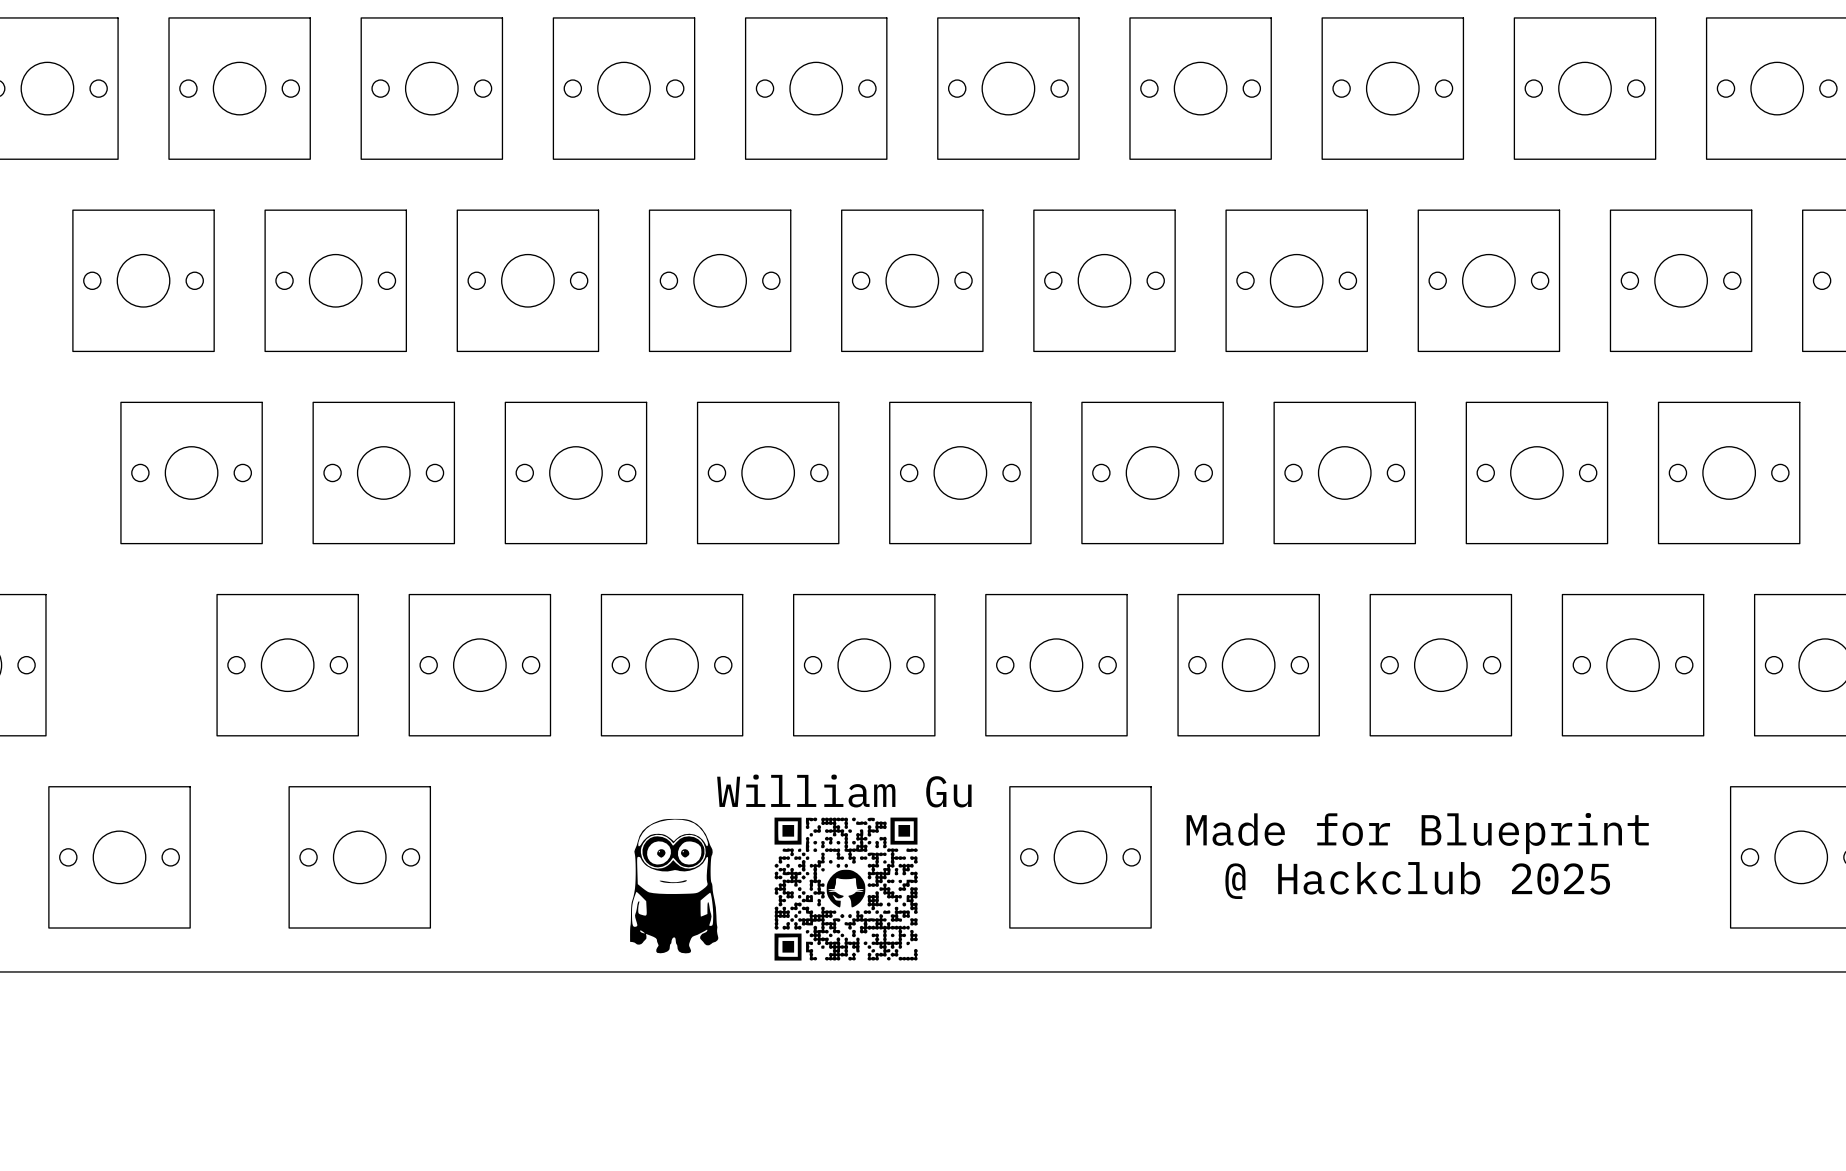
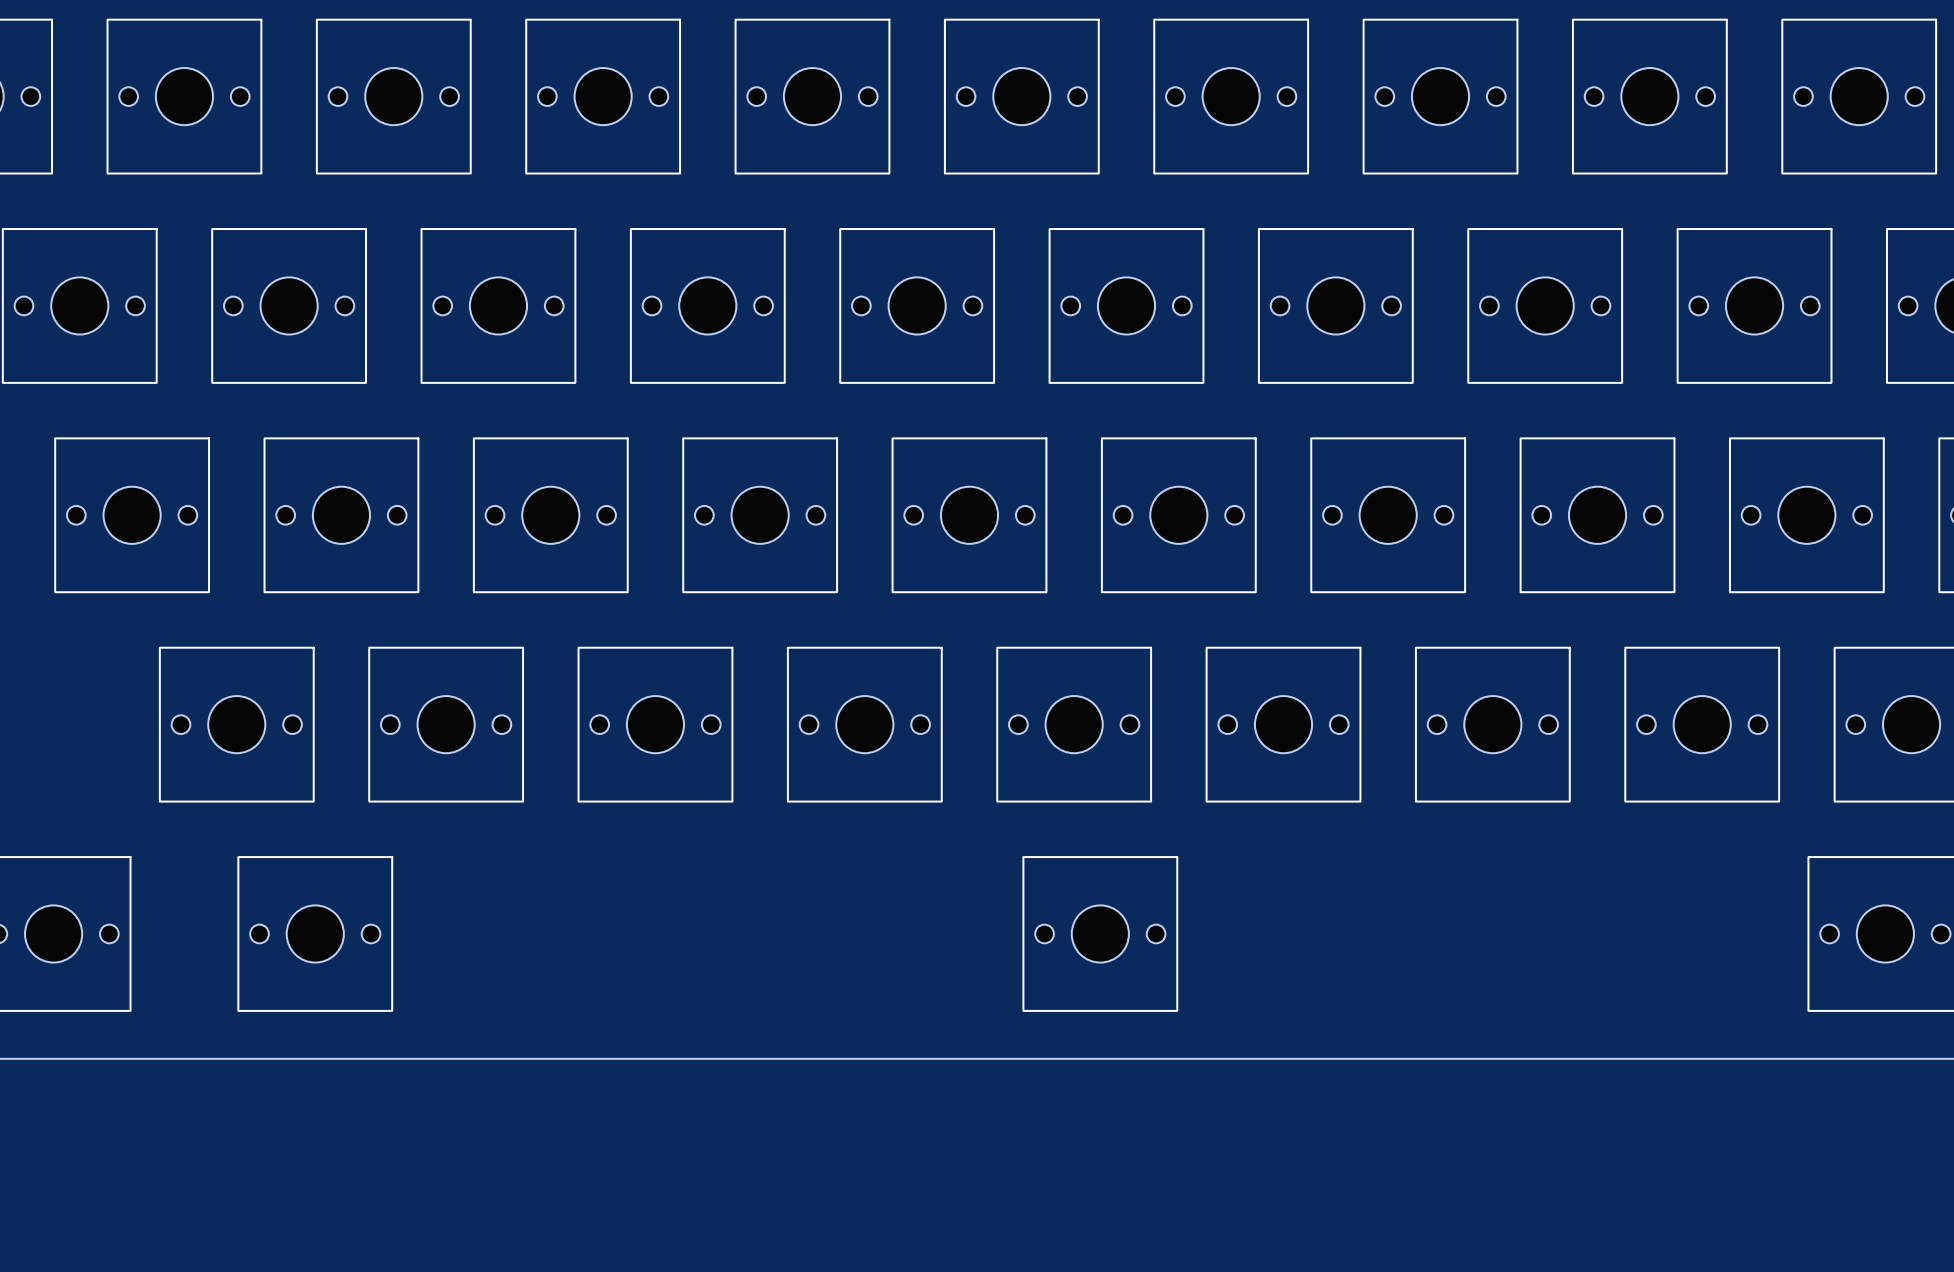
text: William Gu (844, 791) -> none
drawing: [774, 817, 919, 961] -> none
drawing: [630, 818, 719, 954] -> none
text: Made for Blueprint (1417, 833) -> none
text: @ Hackclub 2025 (1417, 880) -> none

